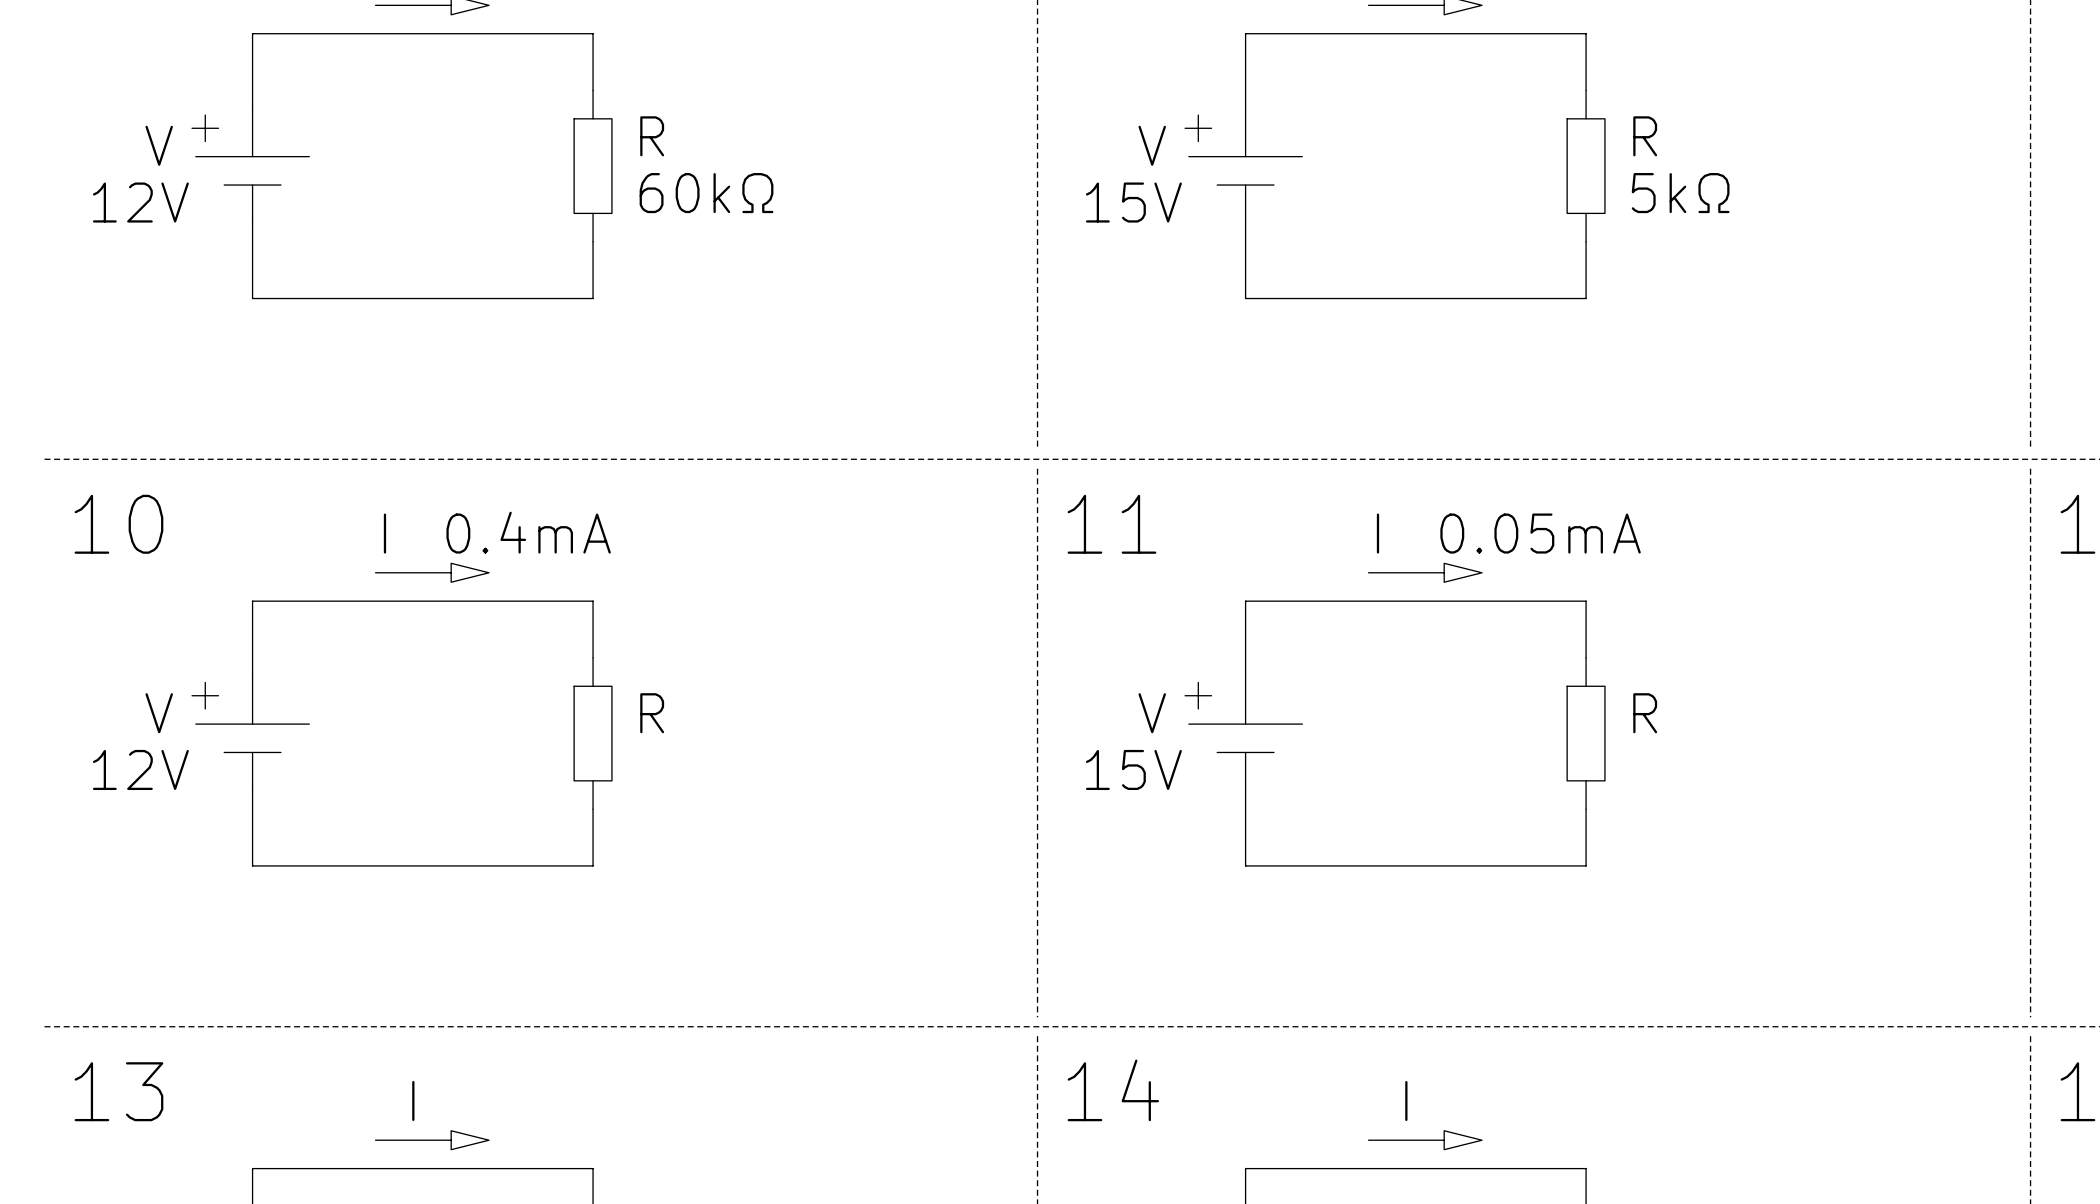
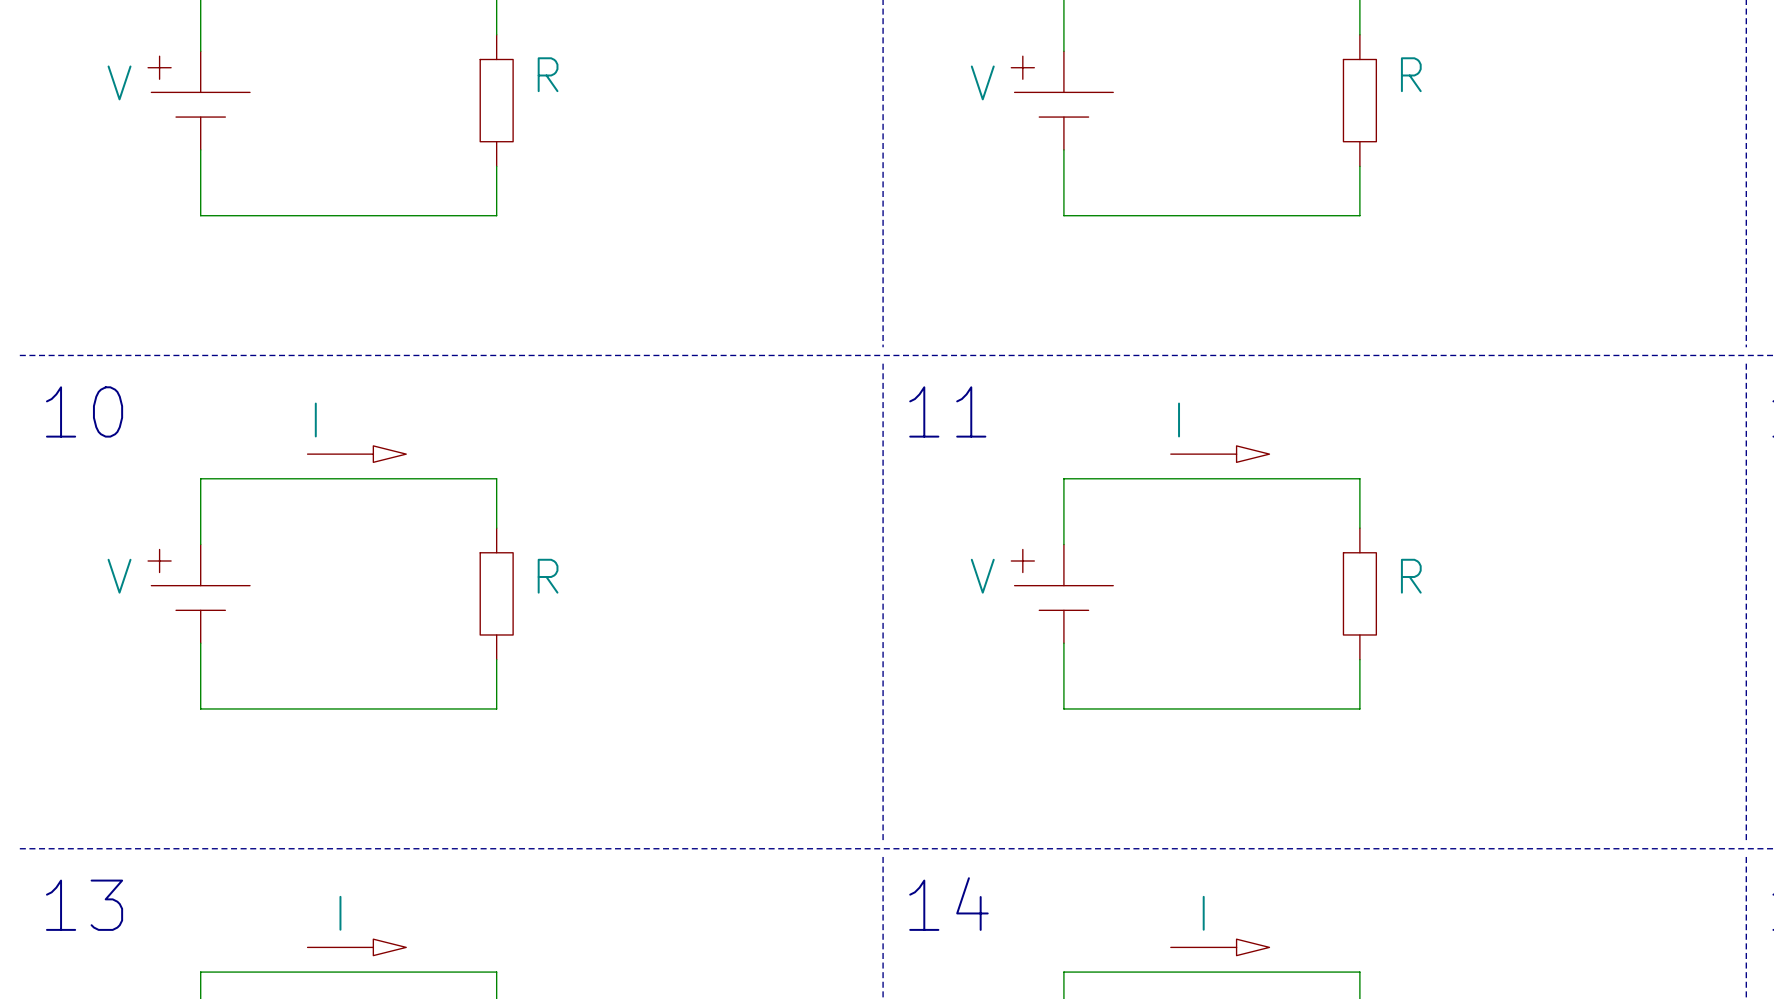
R value: 60kΩ (706, 193) -> none
R value: 5kΩ (1680, 193) -> none
V value: 12V (140, 202) -> none
V value: 15V (1133, 202) -> none
I value: 0.4mA (528, 532) -> none
I value: 0.05mA (1540, 533) -> none
V value: 12V (140, 769) -> none
V value: 15V (1133, 769) -> none

